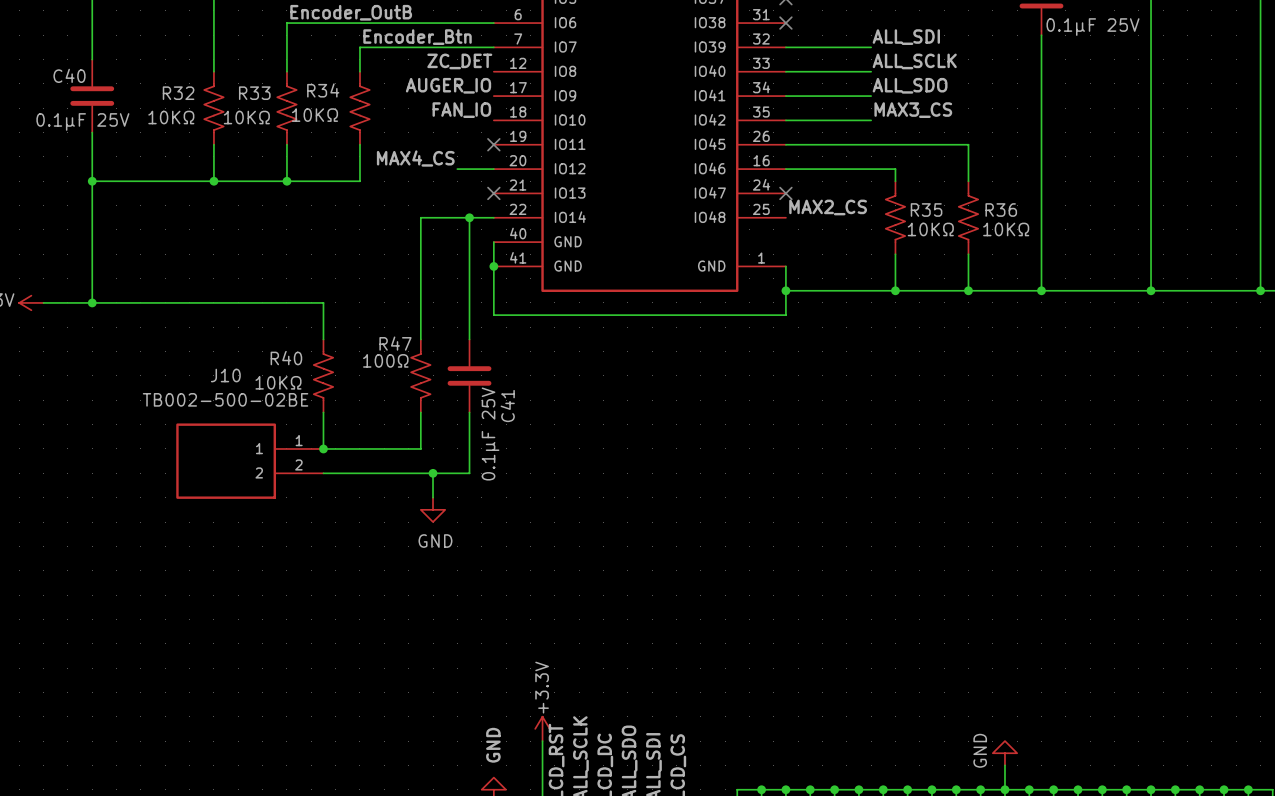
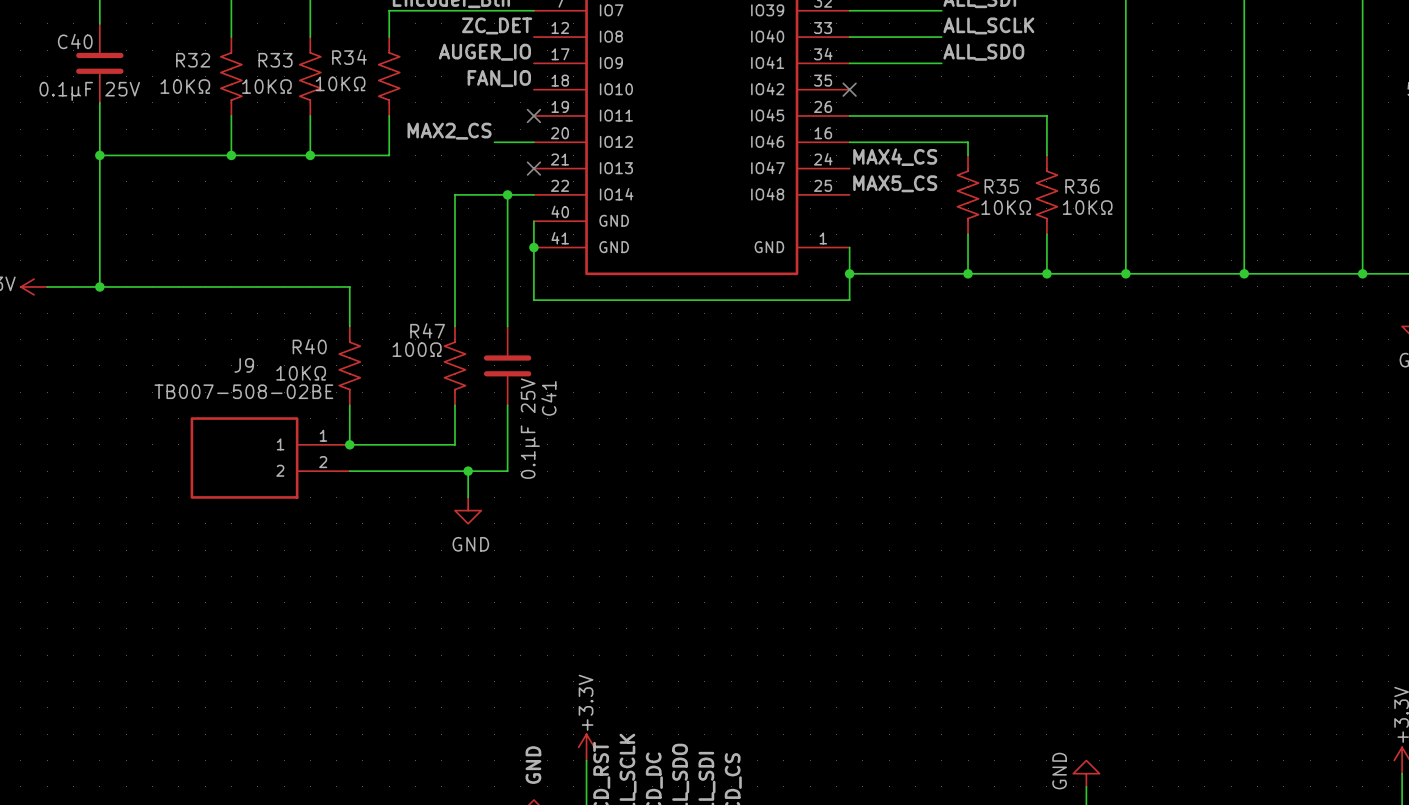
label: MAX3_CS (913, 110) -> none
wire: (785, 120) (871, 120) -> none
no-connect mark: none -> (849, 89)
label: MAX4_CS (415, 158) -> MAX2_CS (449, 131)
label: none -> MAX4_CS (895, 157)
no-connect mark: (785, 193) -> none
label: MAX2_CS (828, 207) -> MAX5_CS (895, 183)
J10 name: J10 (225, 375) -> J9 (244, 365)
J10 value: TB002-500-02BE (225, 399) -> TB007-508-02BE (243, 391)

